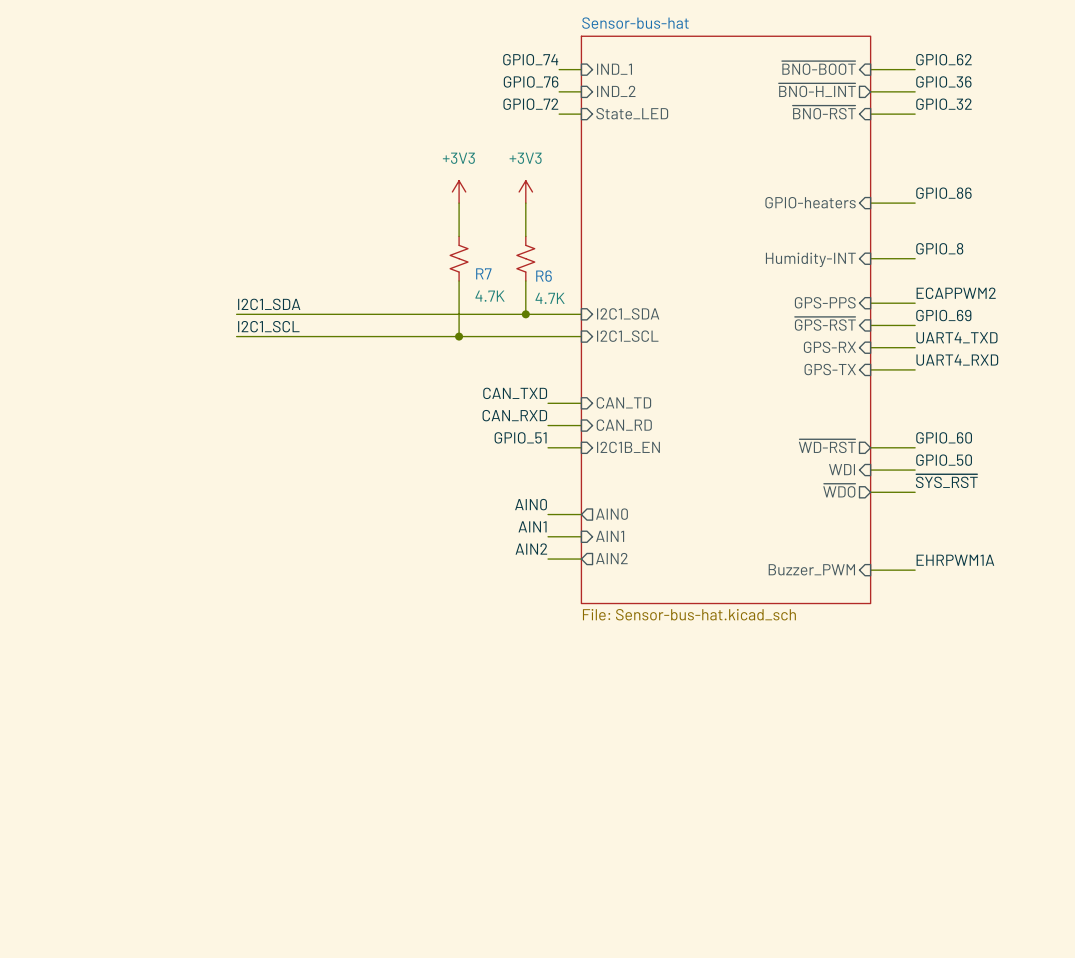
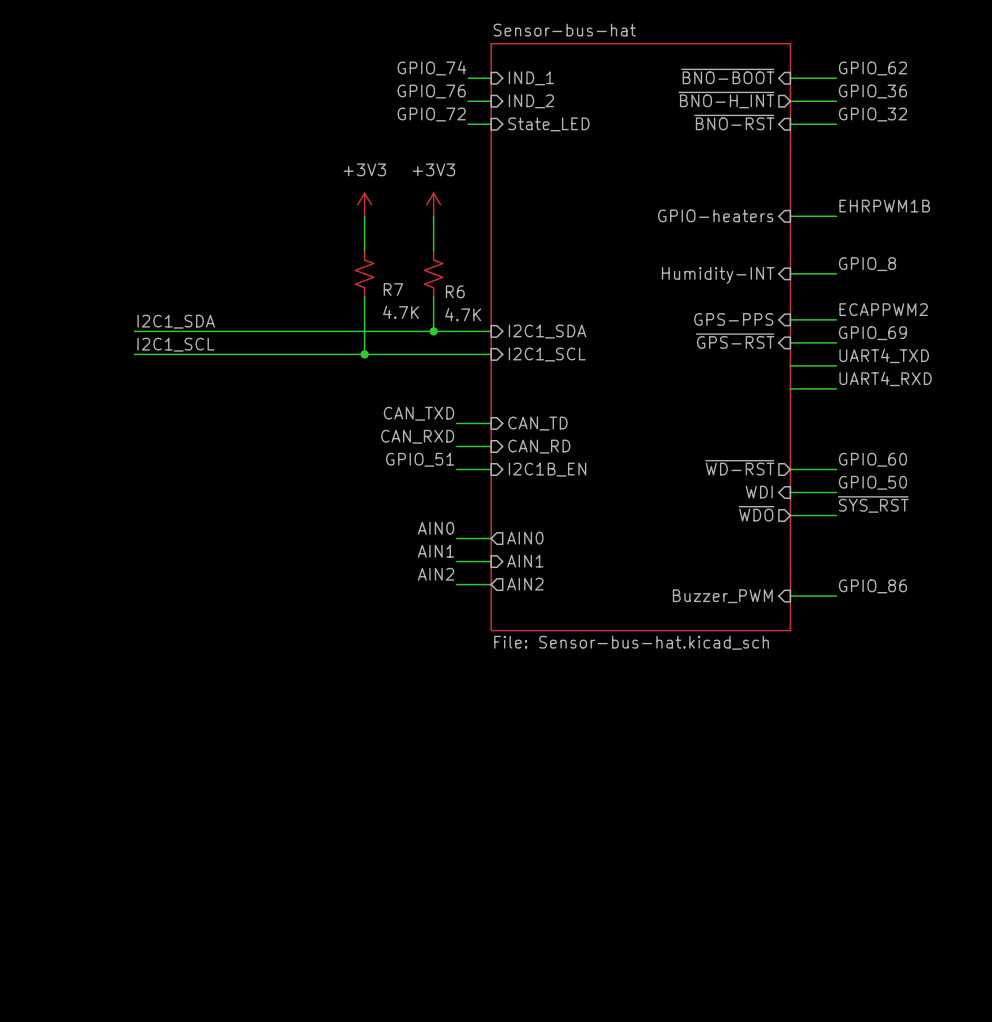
label: GPIO_86 (943, 193) -> EHRPWM1B (884, 206)
sheet pin: GPS-RX (829, 347) -> none
sheet pin: GPS-TX (830, 369) -> none
label: EHRPWM1A (955, 560) -> GPIO_86 (872, 586)

